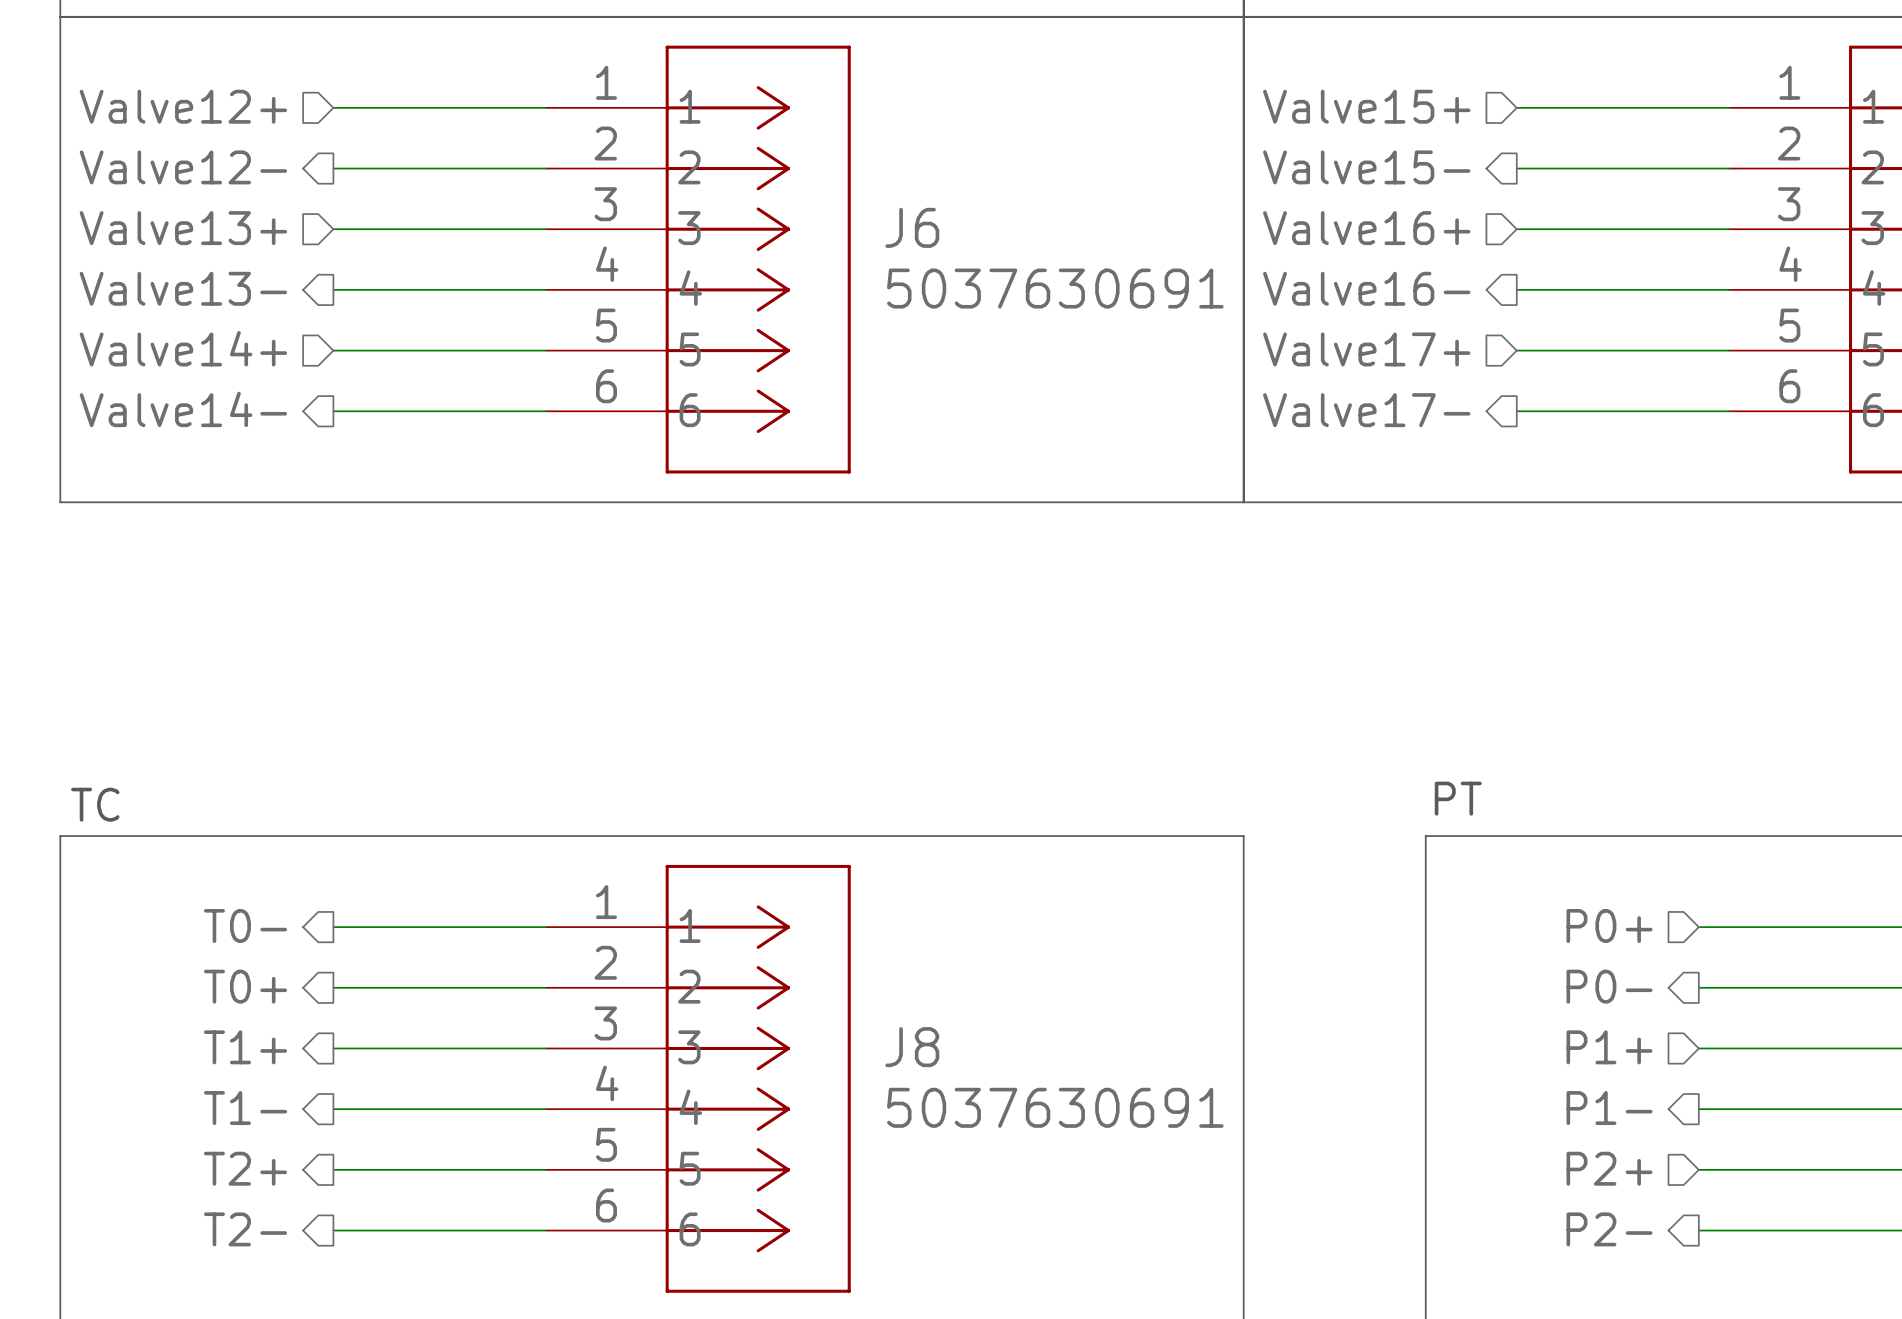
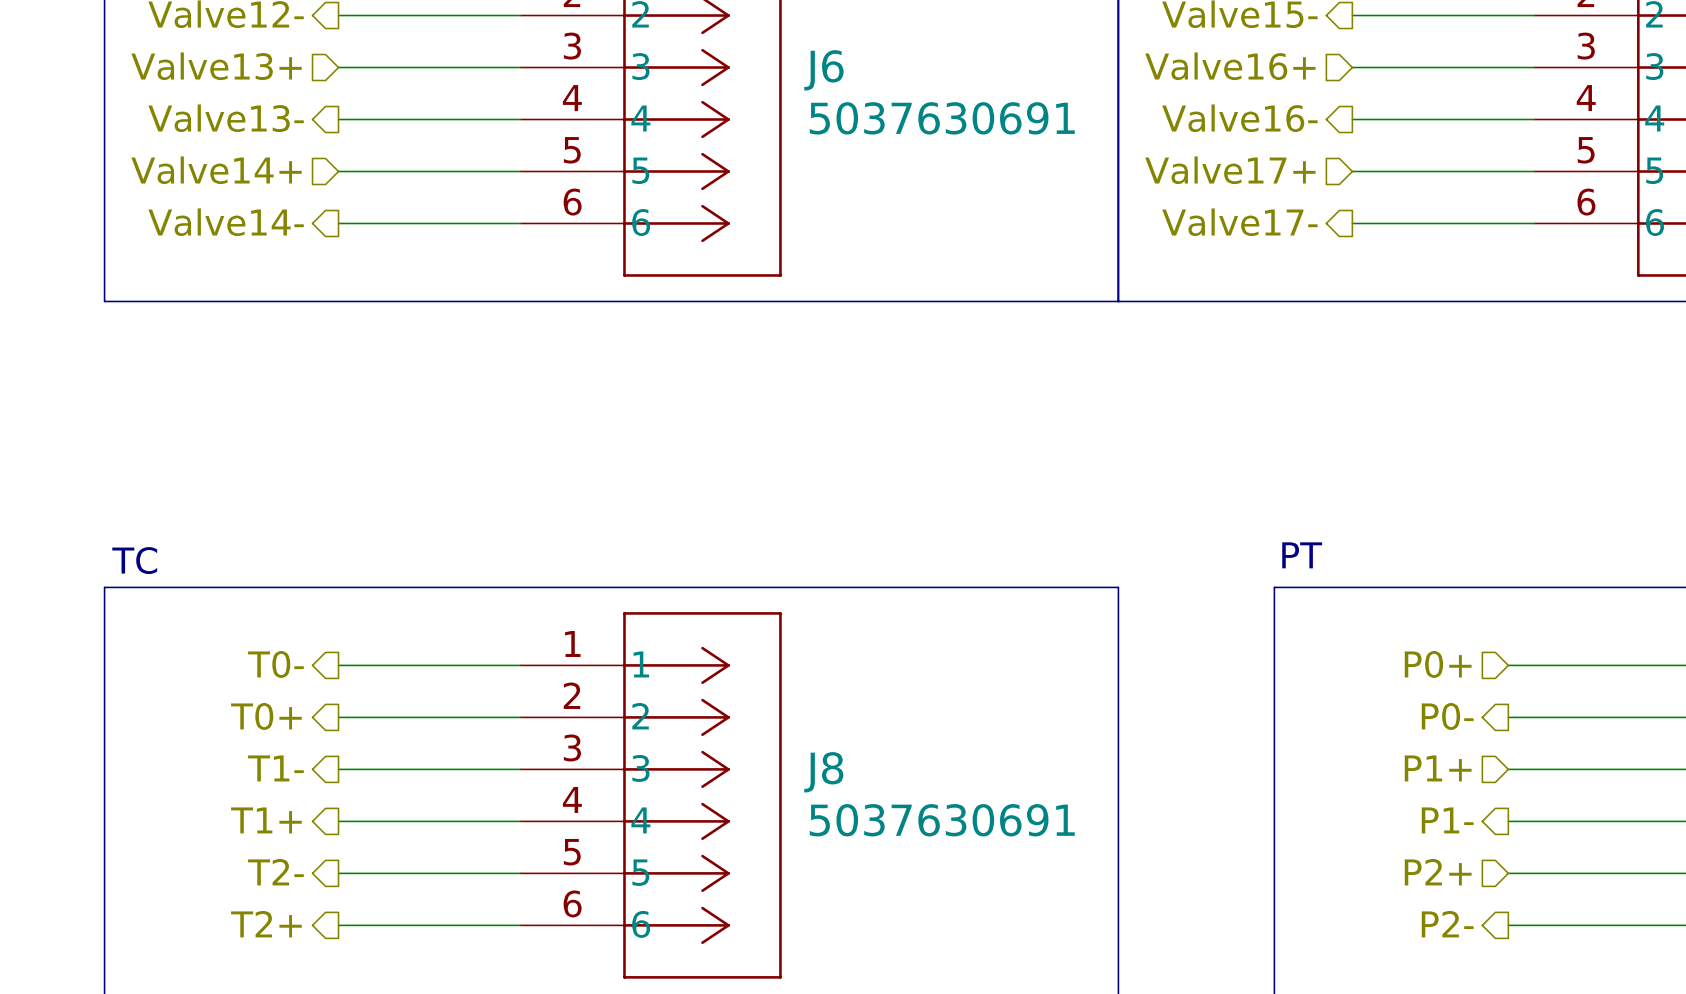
hierarchical label: T1+ (245, 1047) -> T1- (275, 768)
hierarchical label: T1- (245, 1108) -> T1+ (266, 820)
hierarchical label: T2+ (245, 1168) -> T2- (275, 872)
hierarchical label: T2- (245, 1229) -> T2+ (266, 924)

